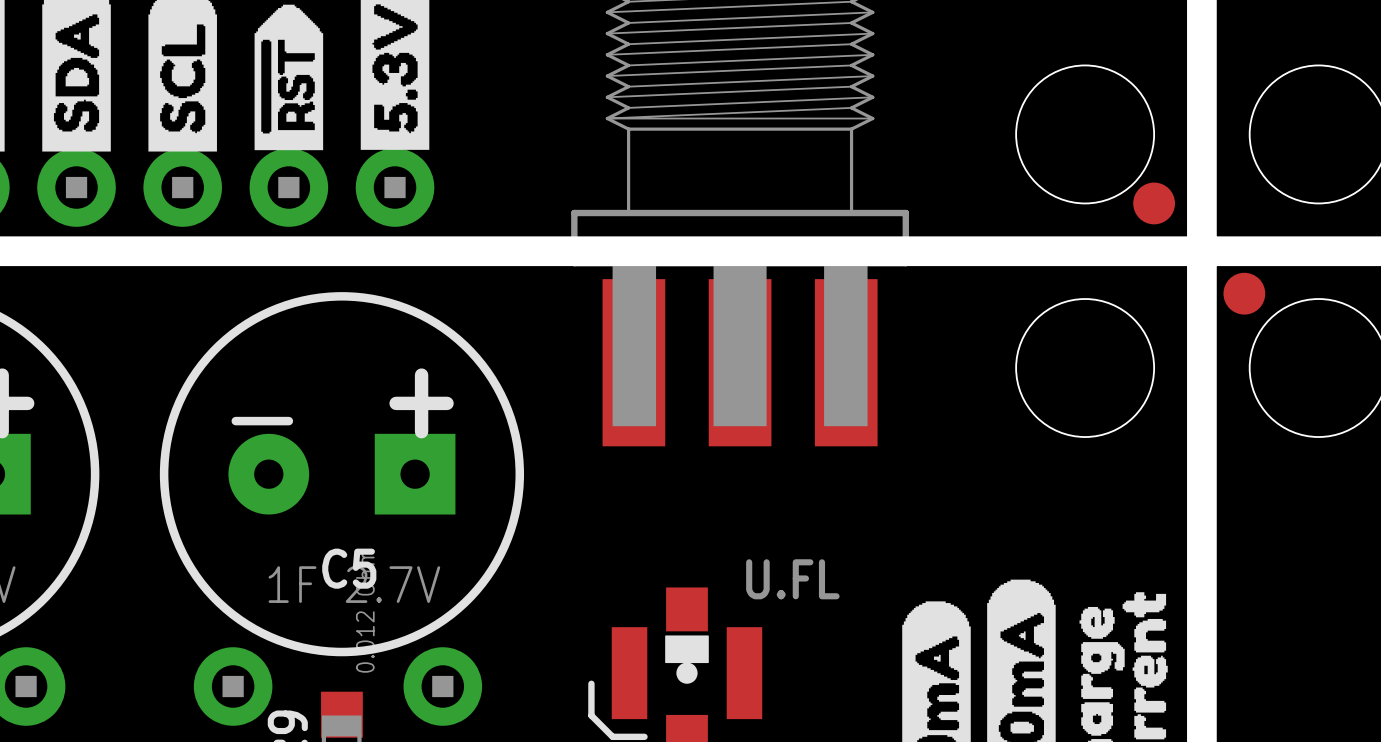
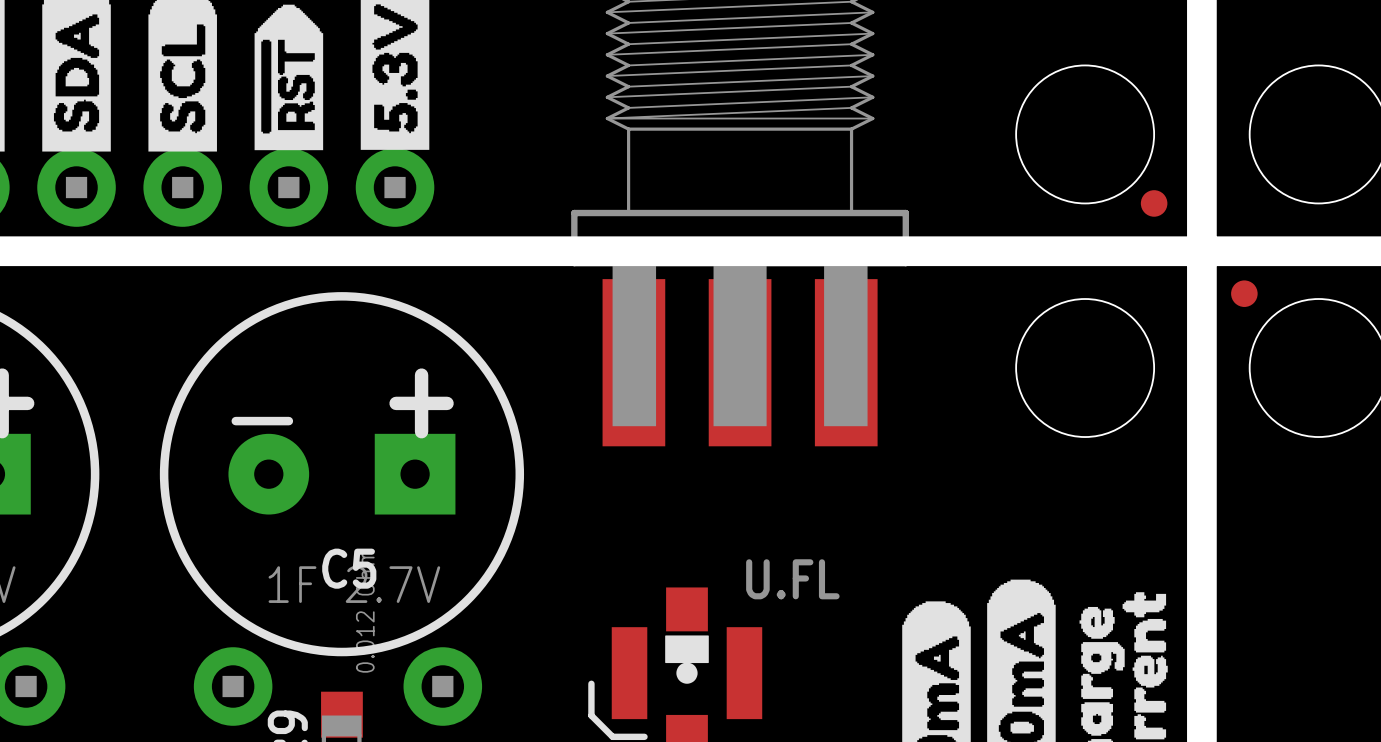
part footprint: [1133, 182, 1176, 225] -> [1140, 190, 1168, 217]
part footprint: [1223, 272, 1266, 315] -> [1231, 280, 1258, 307]

